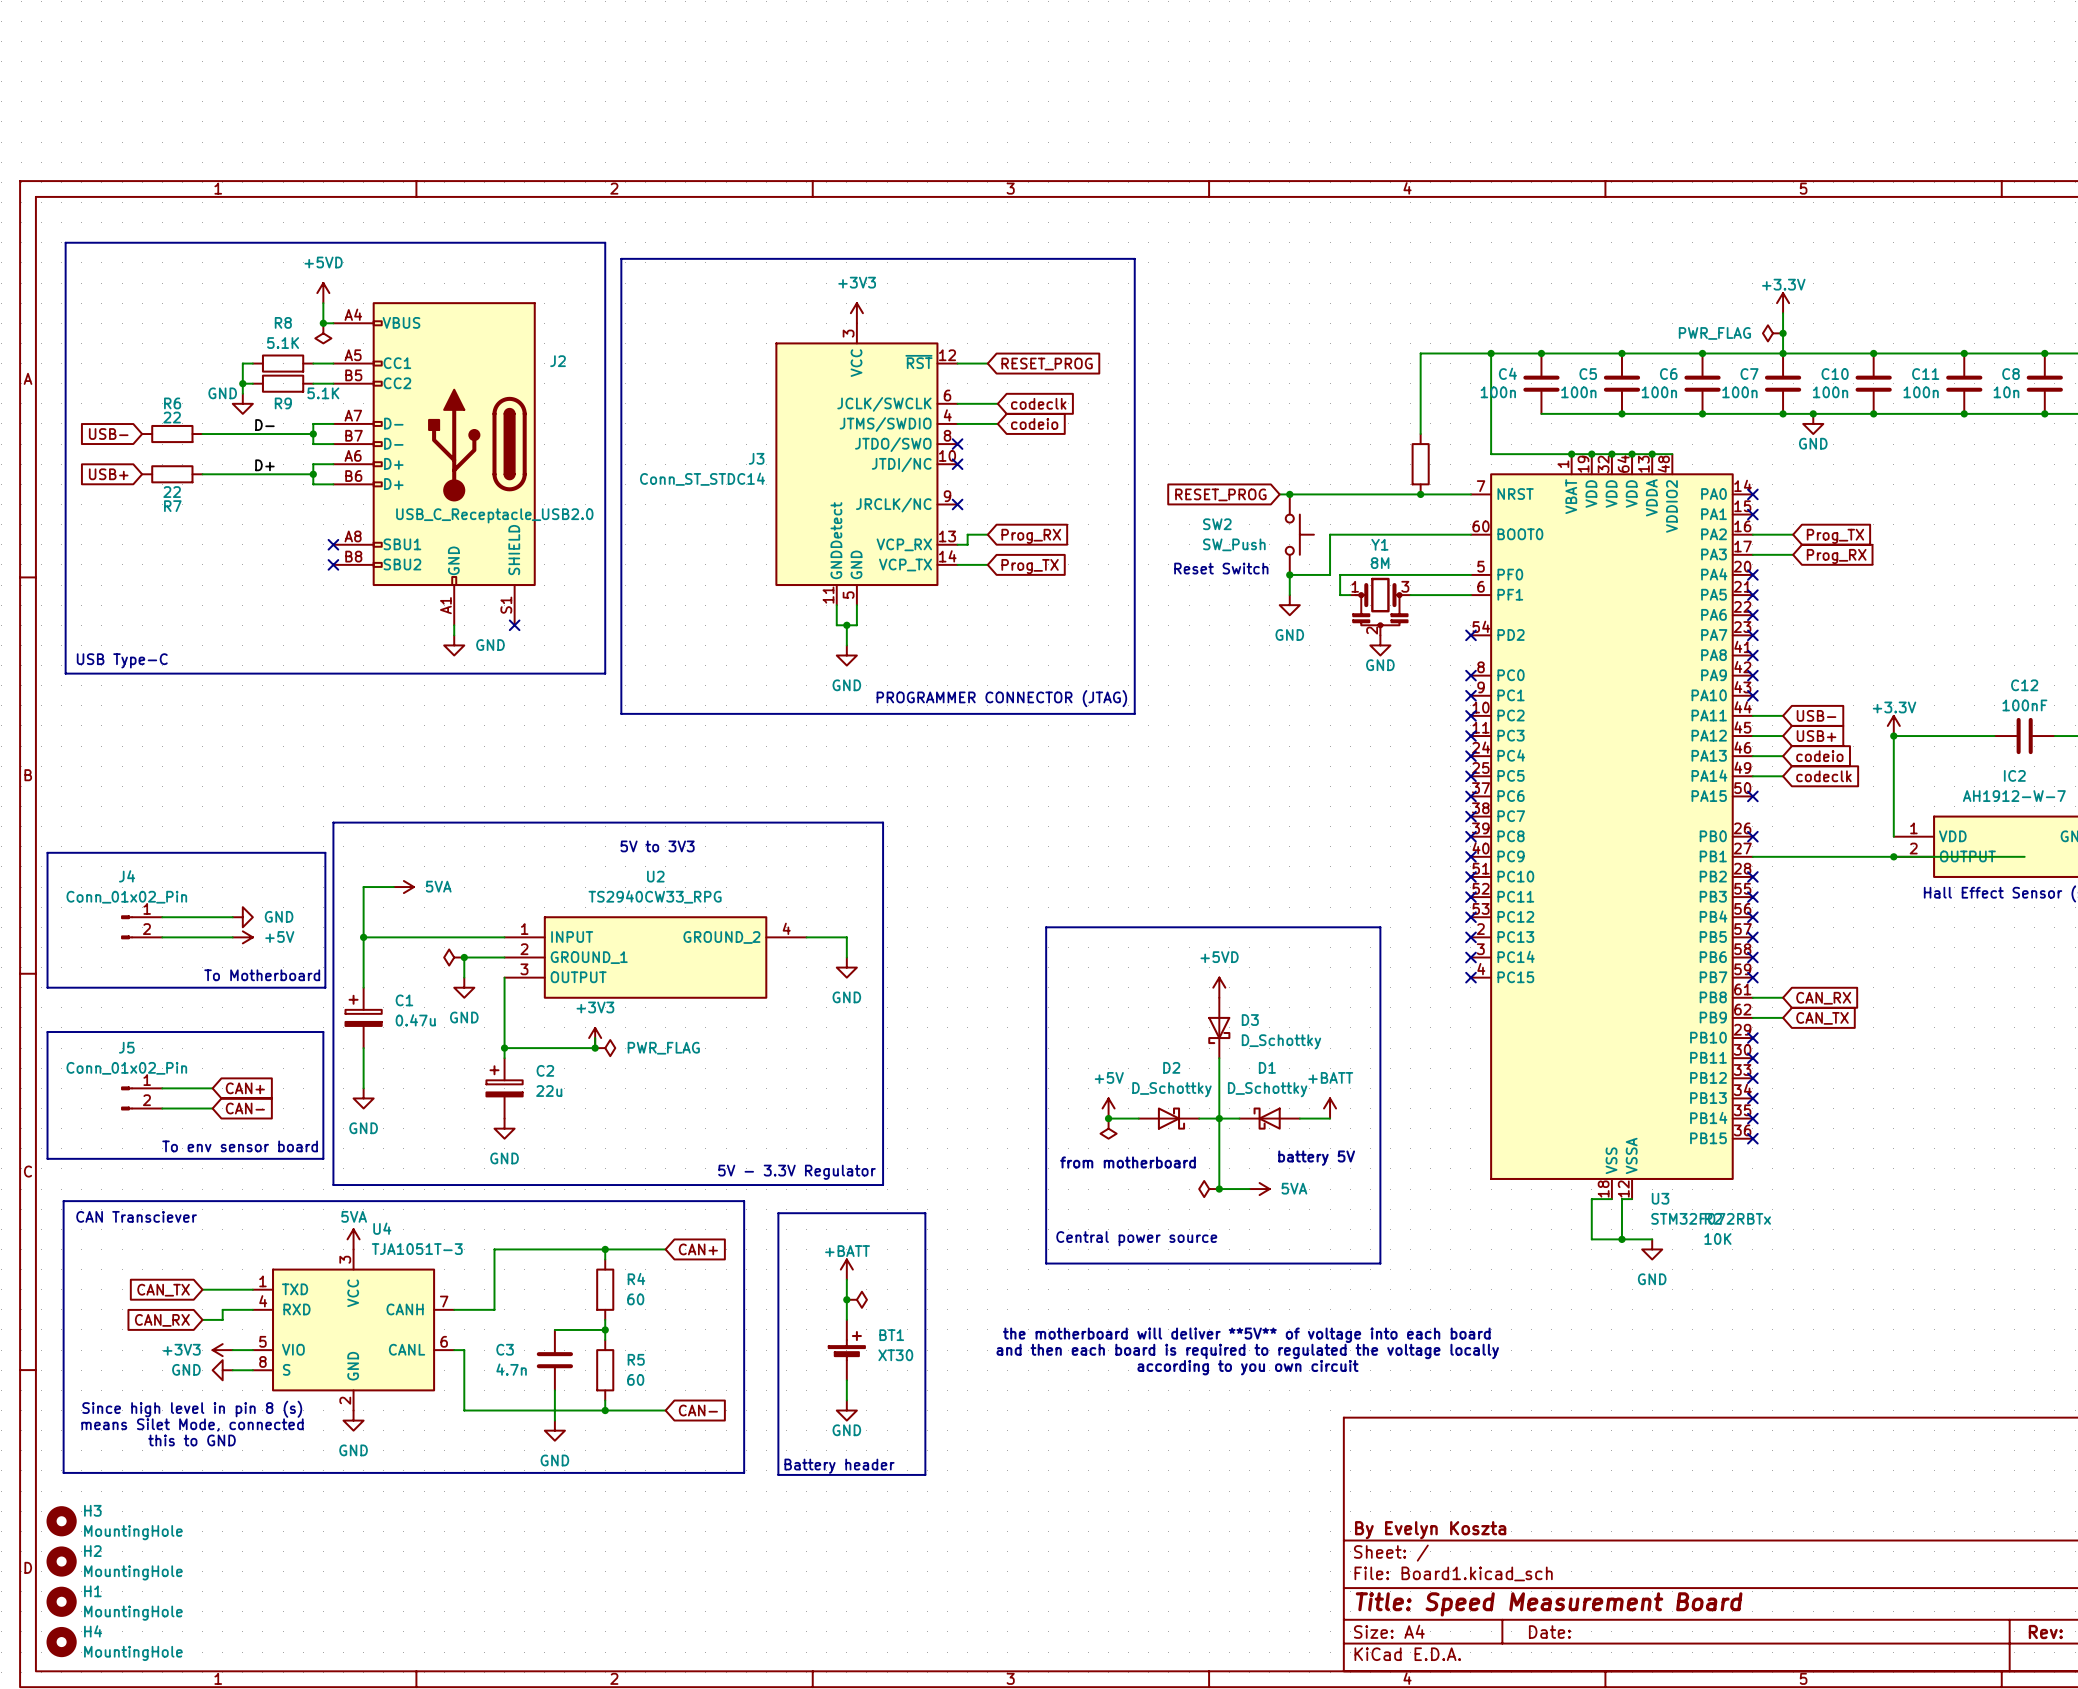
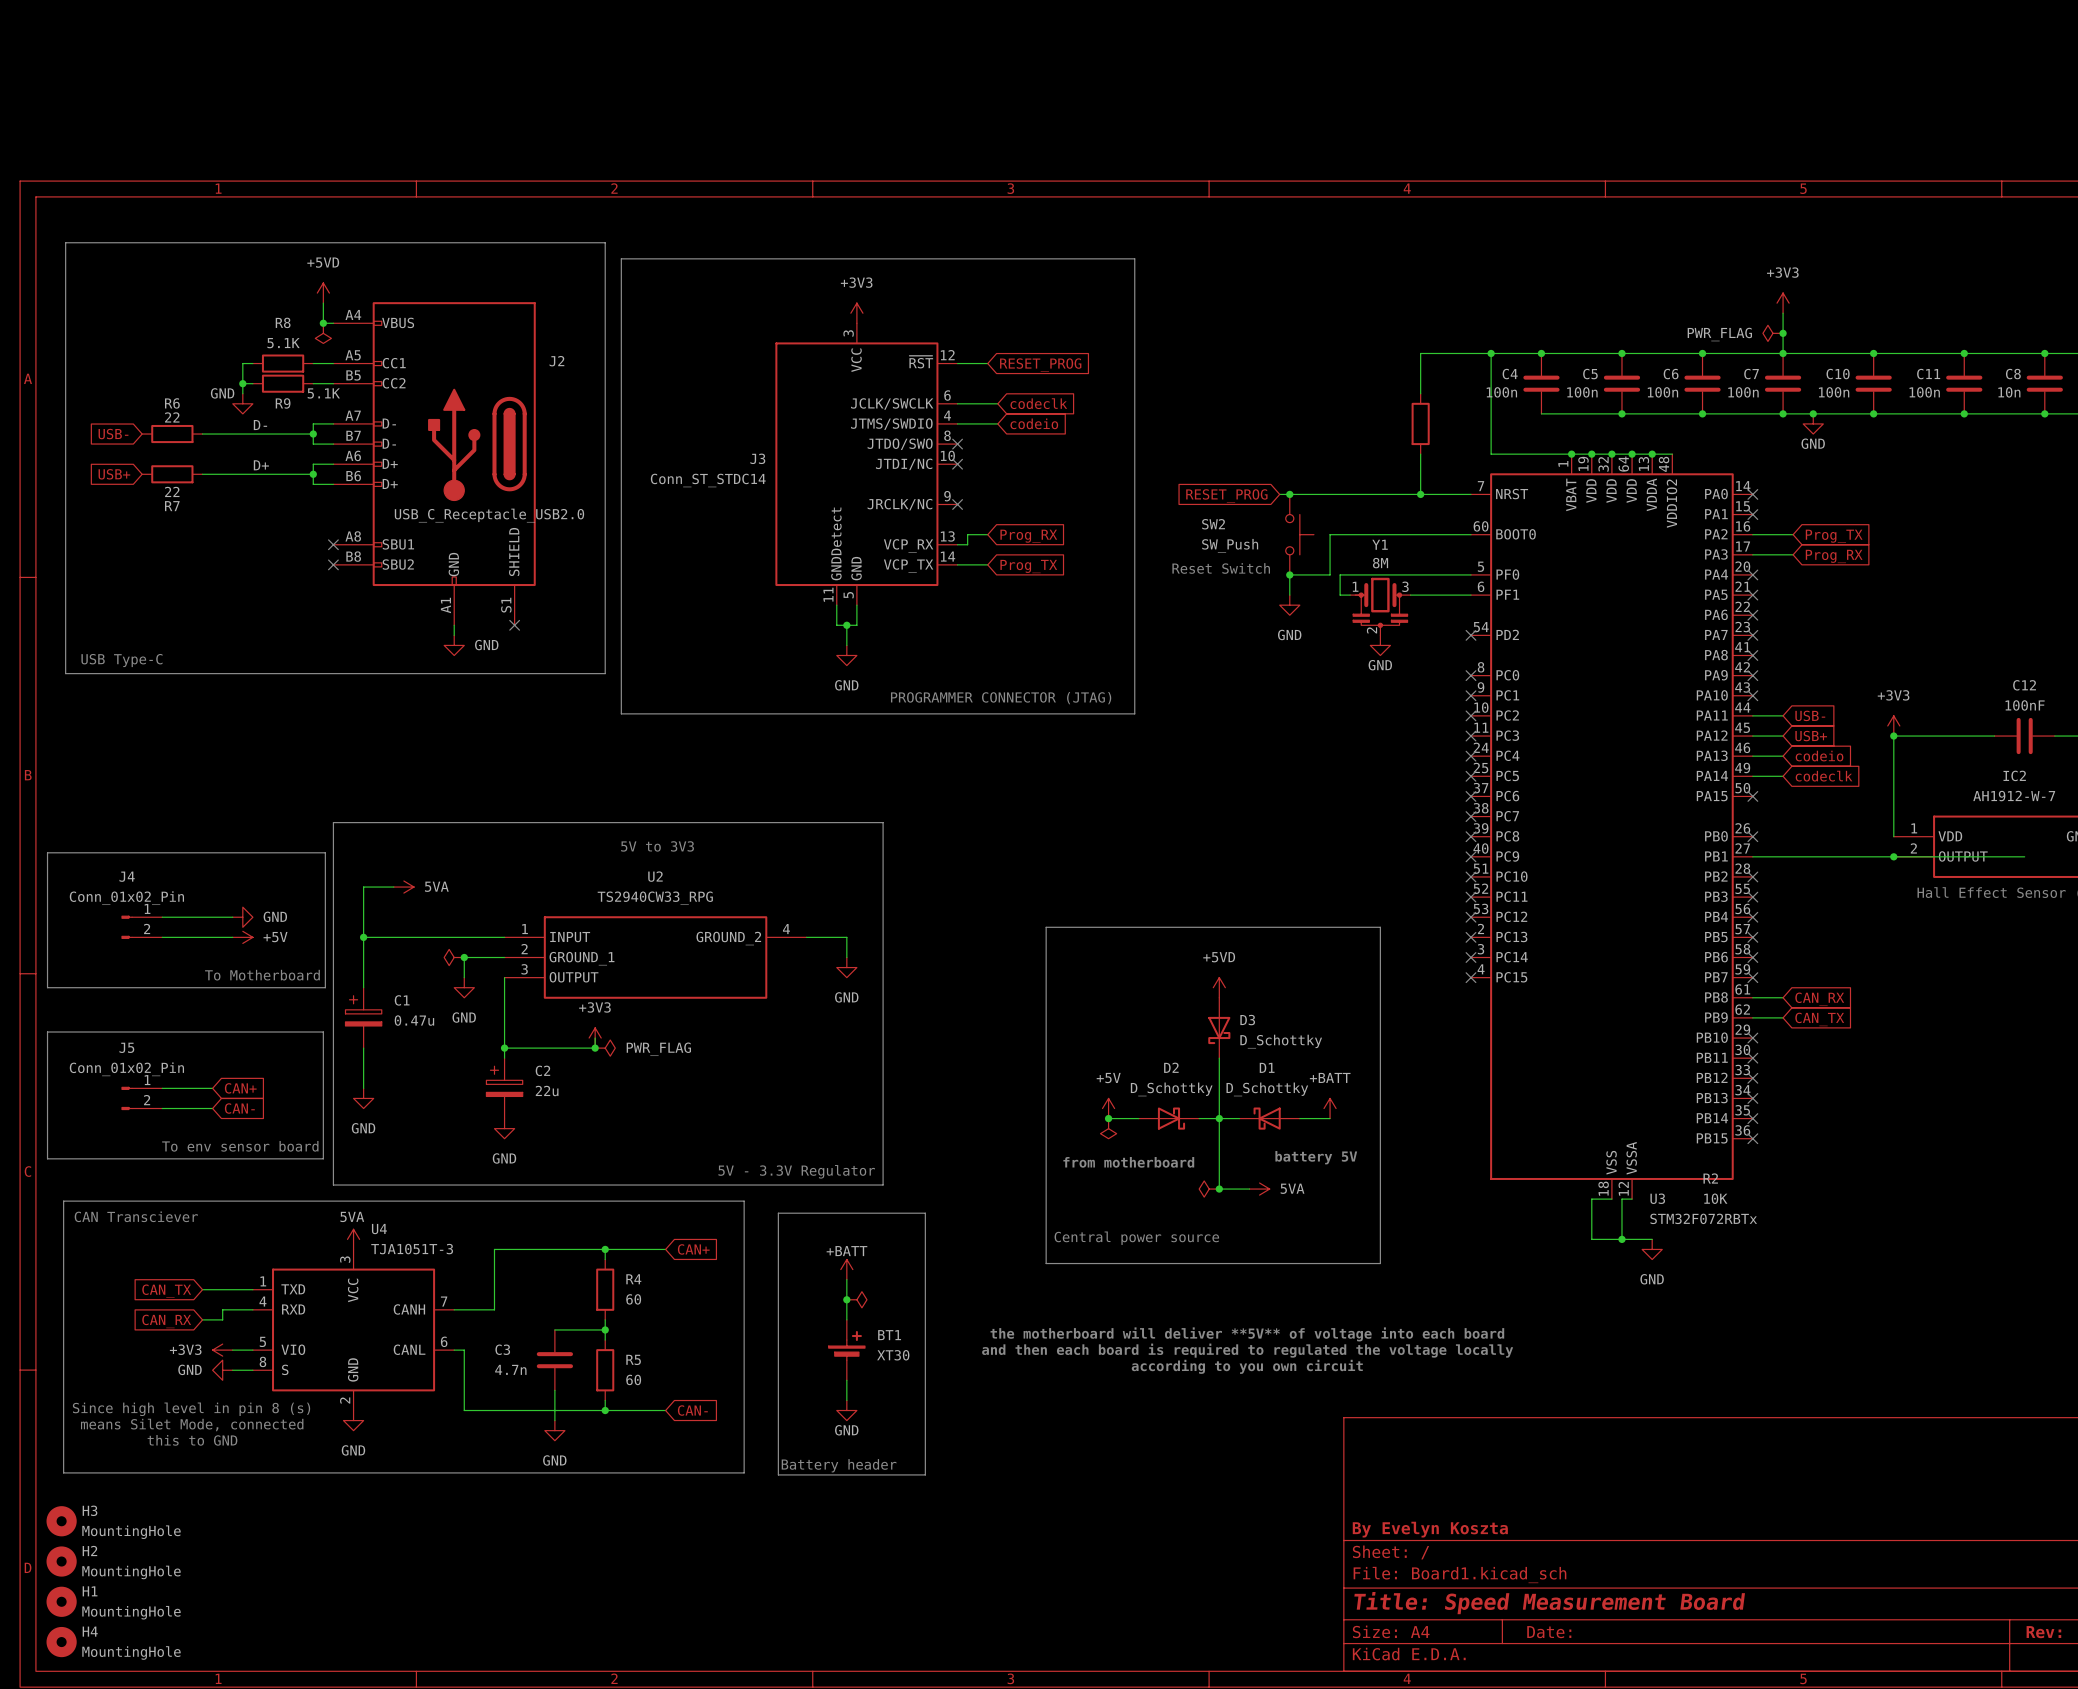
power symbol: +3.3V (1783, 303) -> +3V3 (1783, 303)
wire: (1420, 393) (1420, 434) -> (1420, 454) (1420, 494)
R2 position: (1420, 464) -> (1420, 423)
power symbol: +3.3V (1893, 725) -> +3V3 (1893, 725)

